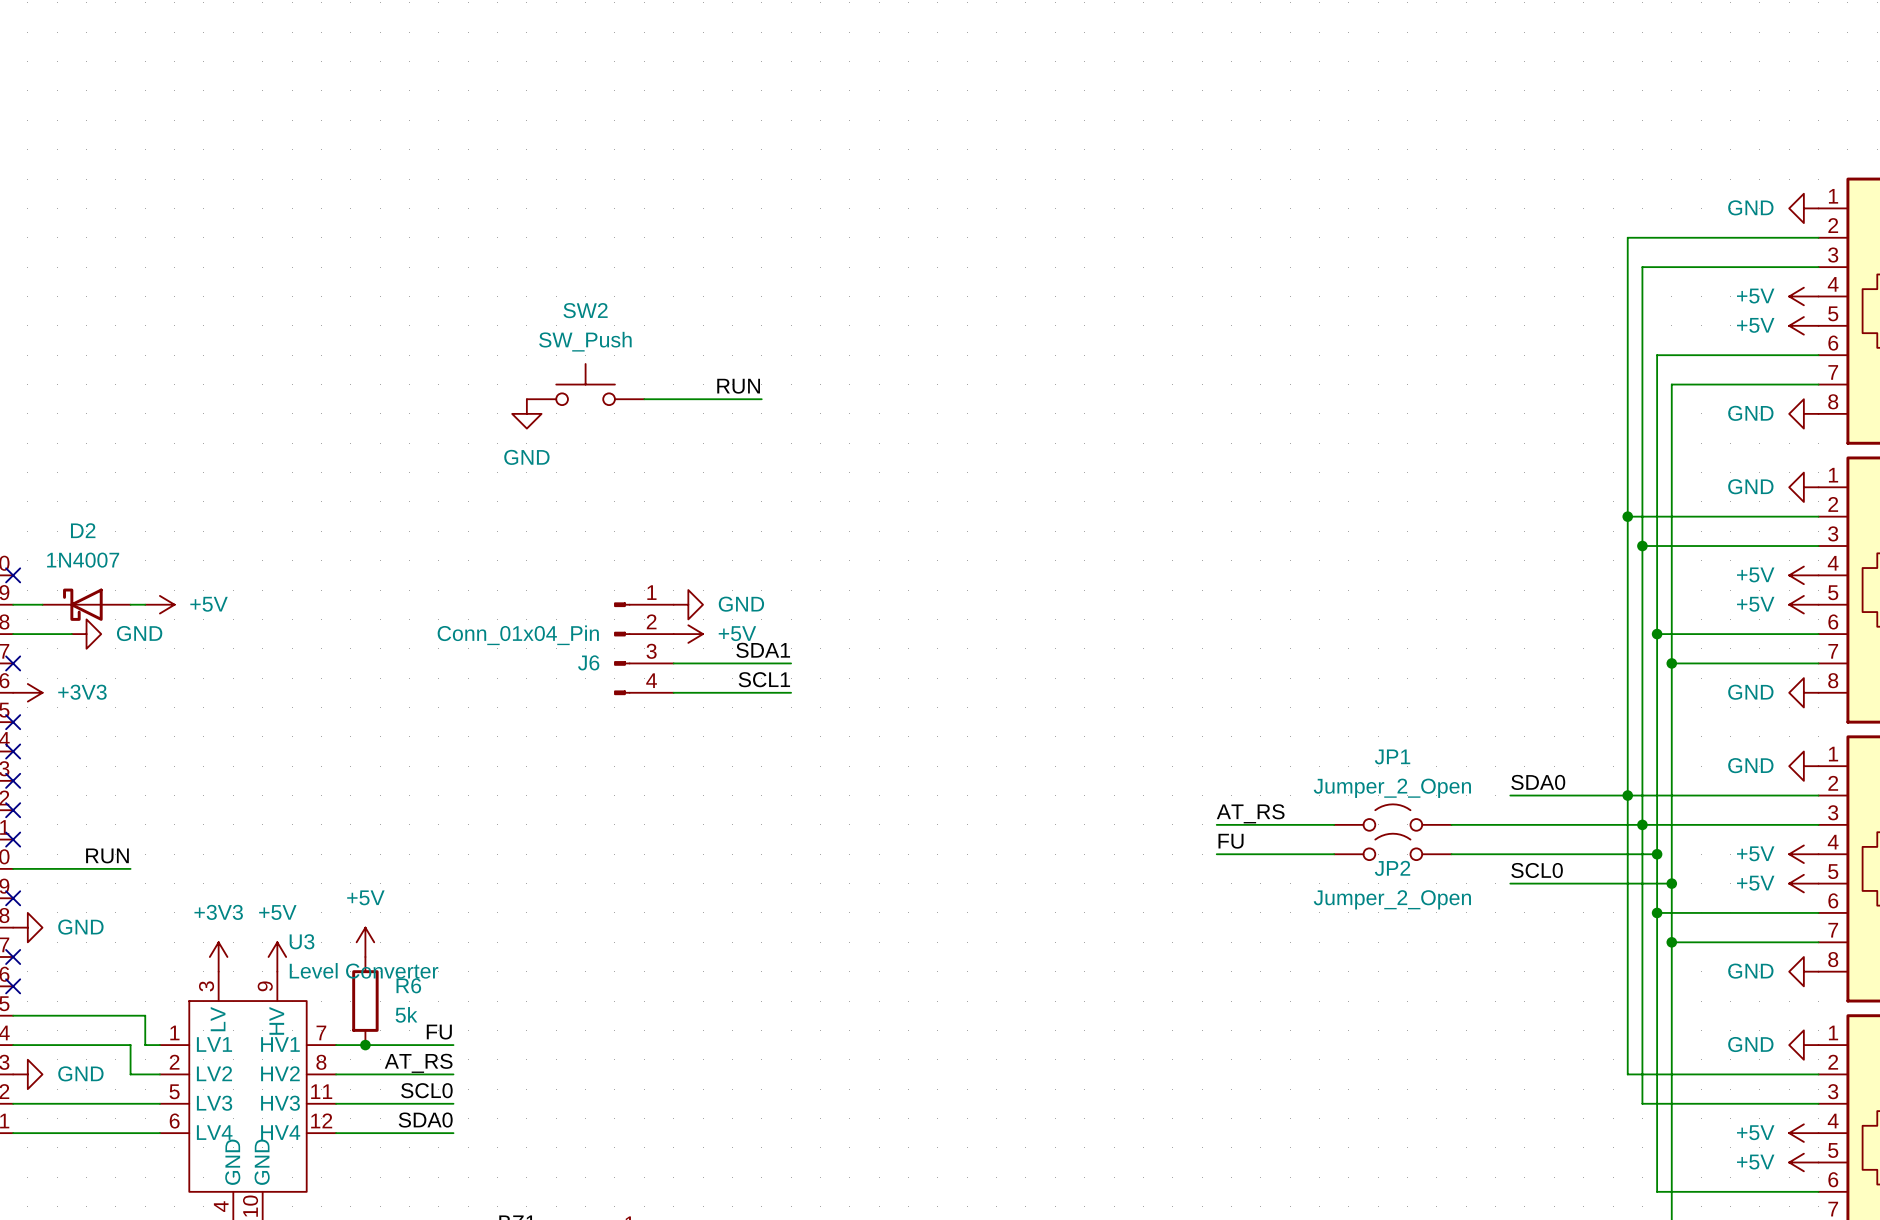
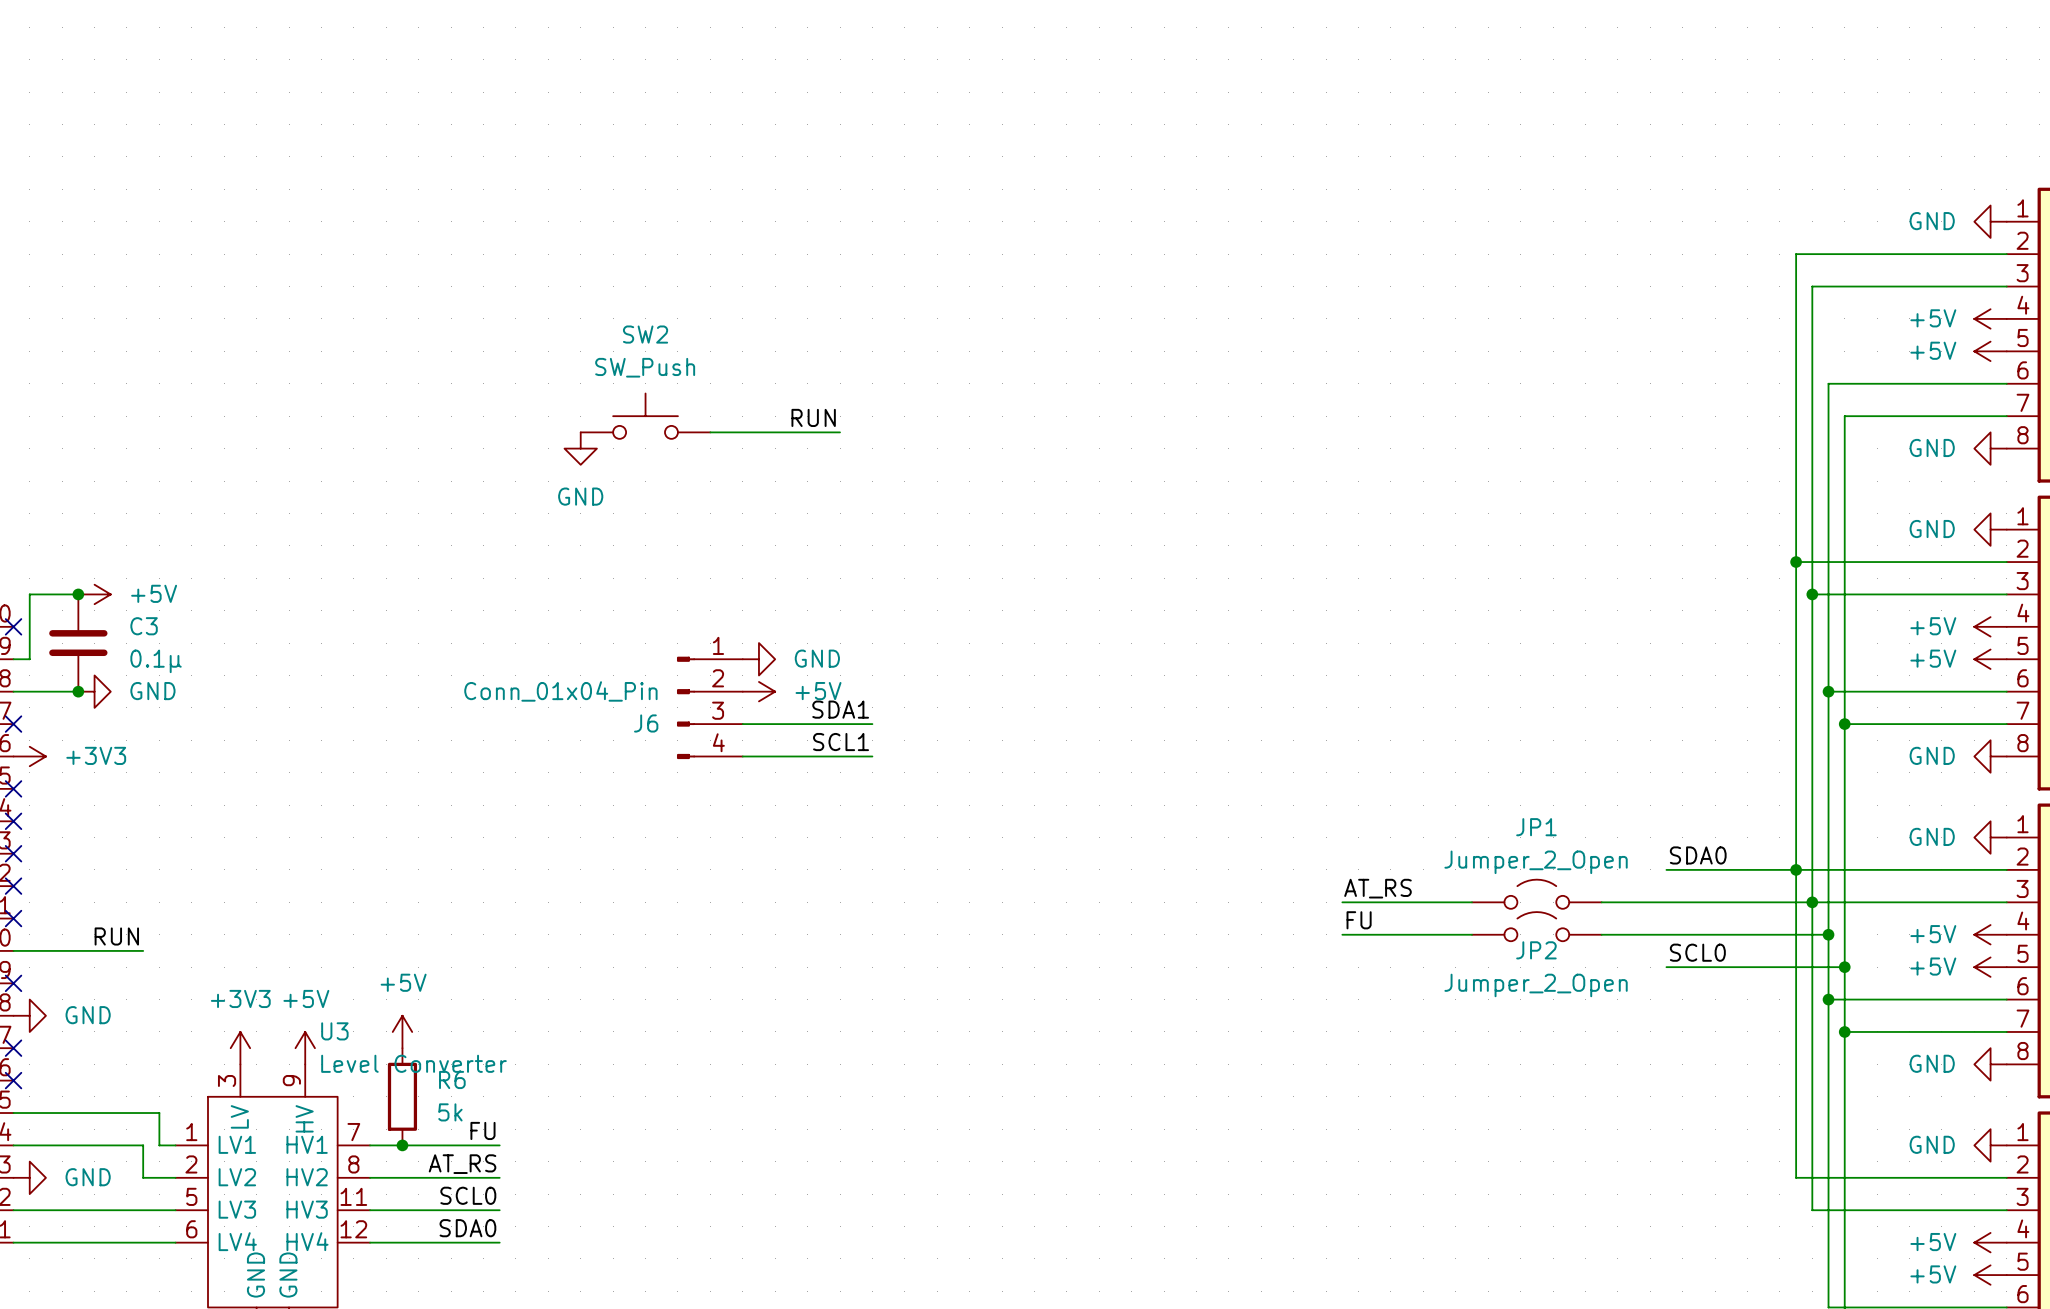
junction: none -> (78, 594)
C3: none -> 0.1μ (78, 643)
wire: (27, 604) (42, 604) -> (29, 659) (29, 594) (78, 594)
D2: 1N4007 (86, 604) -> none
wire: (130, 604) (145, 604) -> none
power symbol position: +5V (159, 604) -> +5V (94, 594)
junction: none -> (78, 691)

